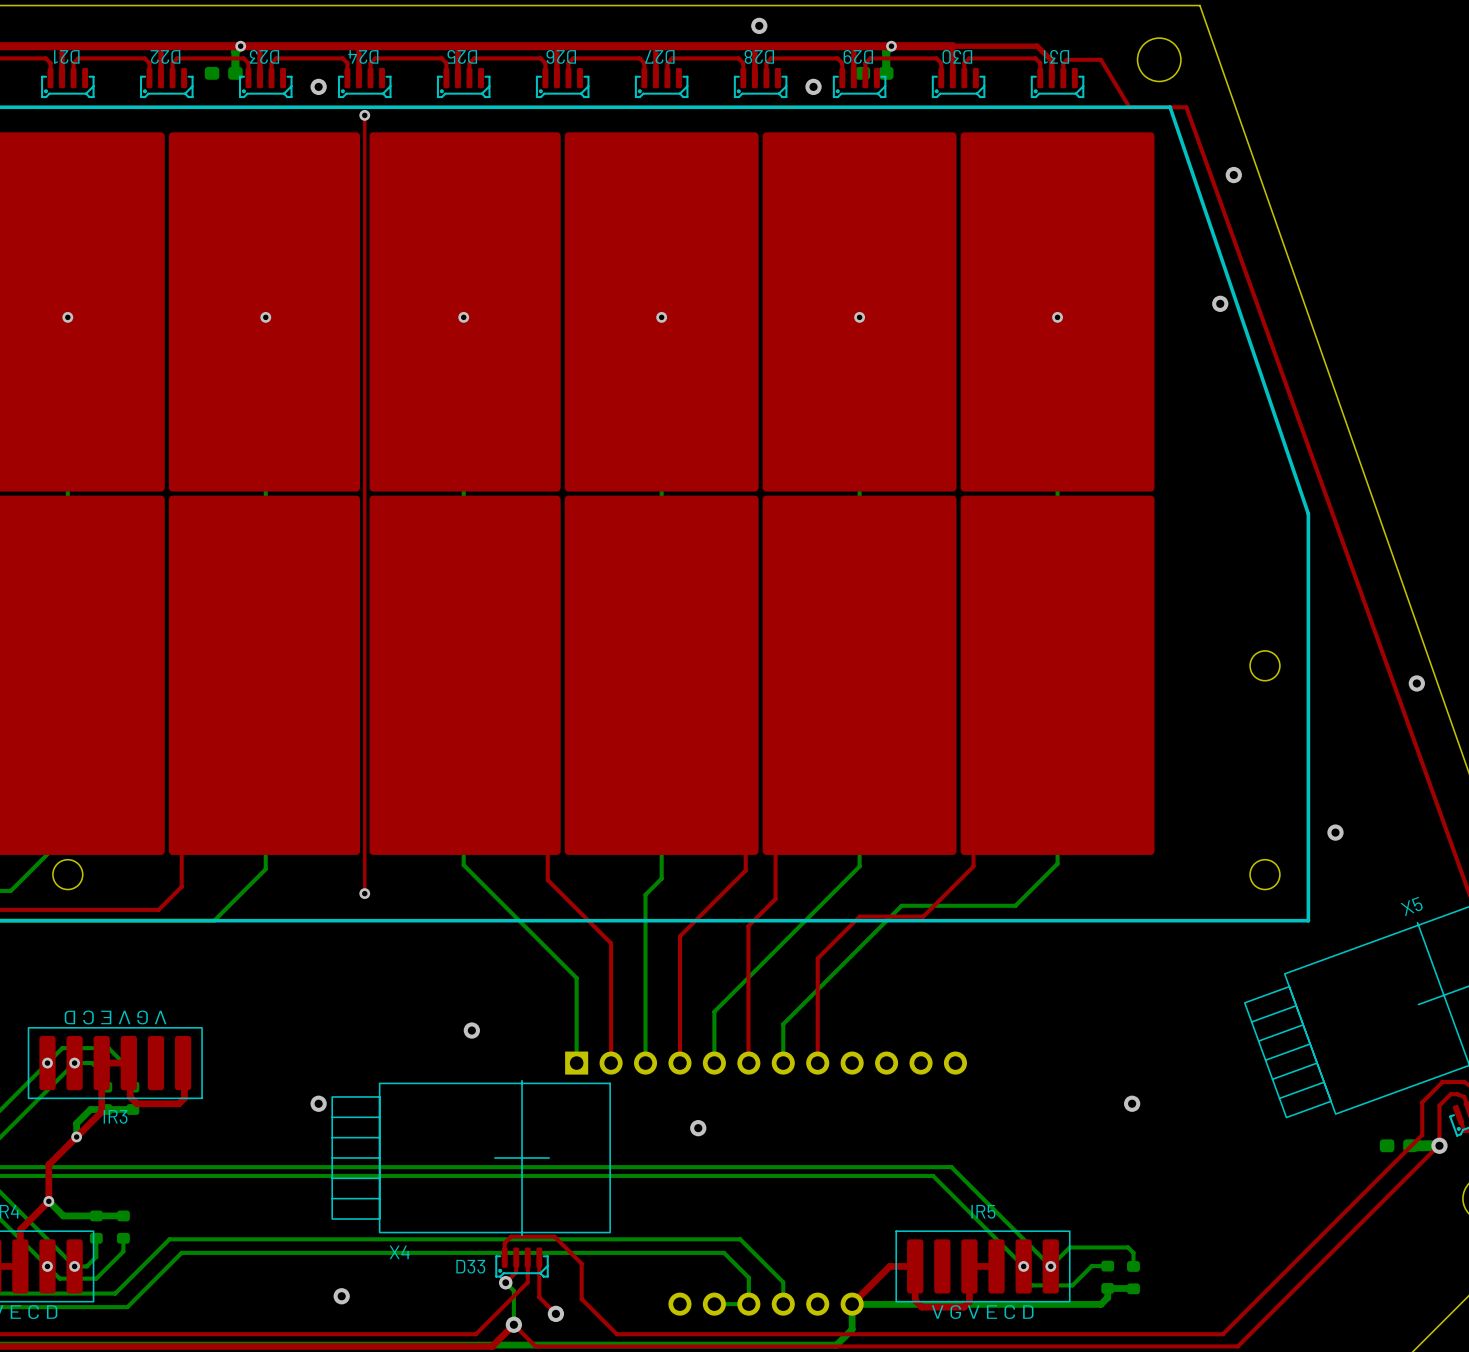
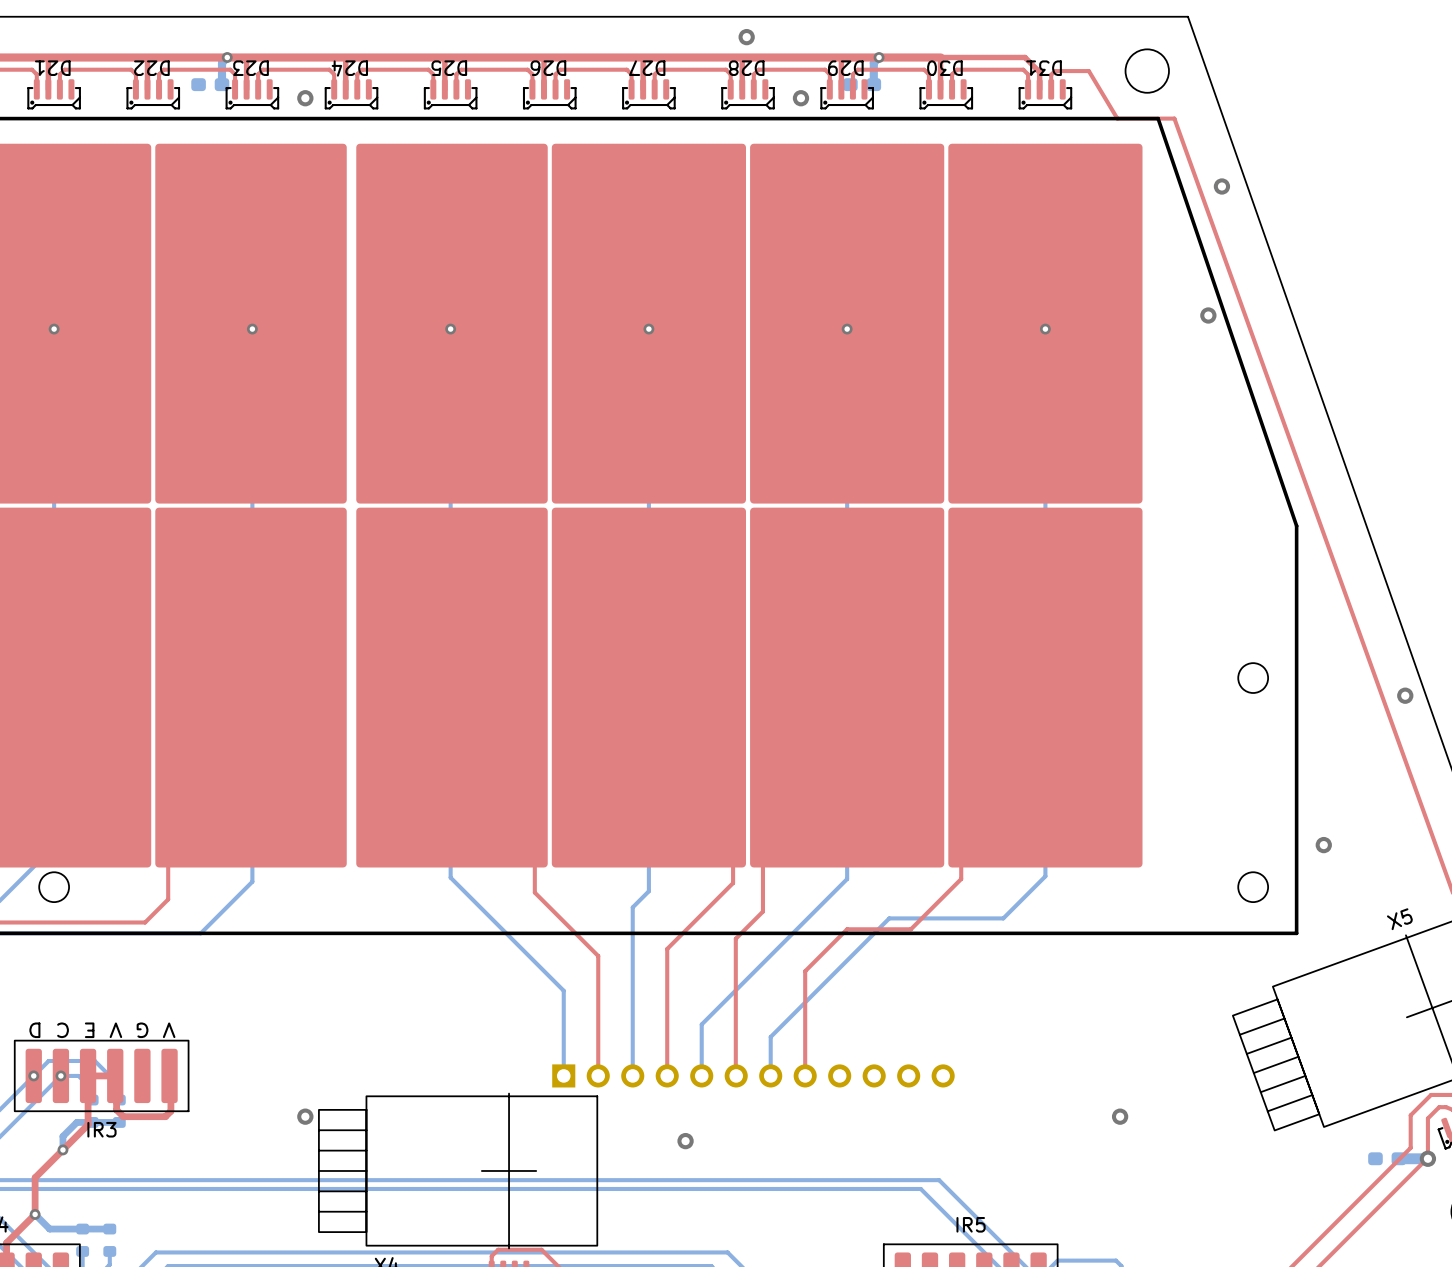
top track: (364, 115) (364, 893) -> none
via: (364, 115) -> none
via: (364, 893) -> none
via: (471, 1030) -> none

